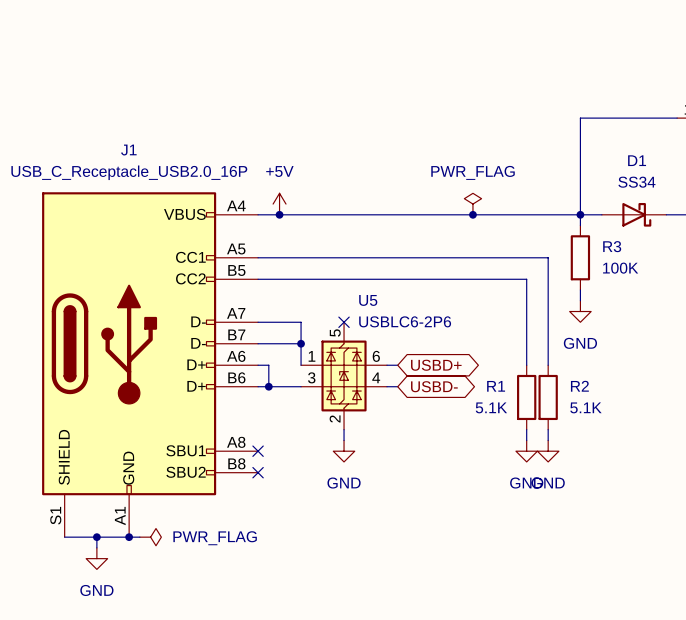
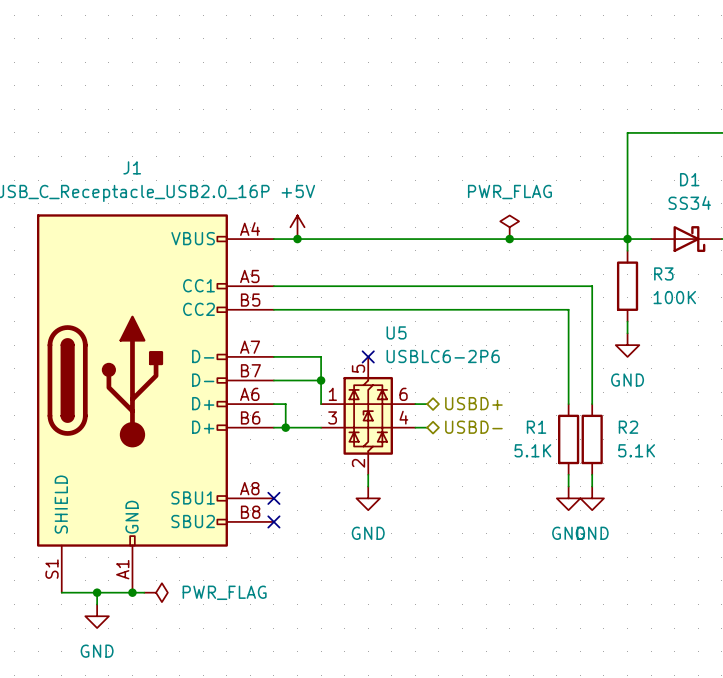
hierarchical label: none -> USBD+ (473, 403)
global label: USBD+ (436, 365) -> none
global label: USBD- (434, 386) -> none
hierarchical label: none -> USBD- (473, 427)

